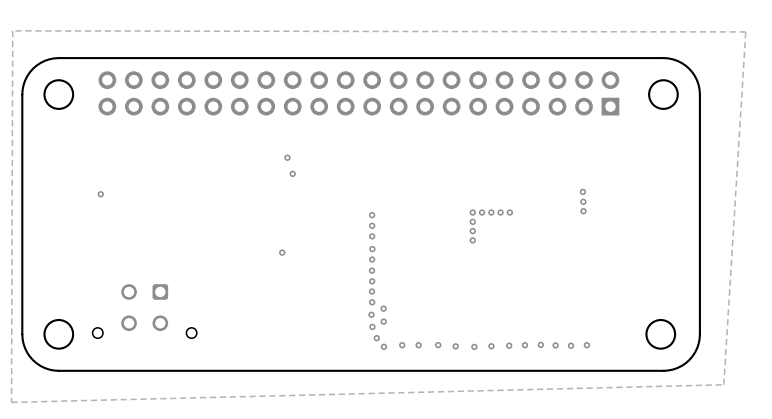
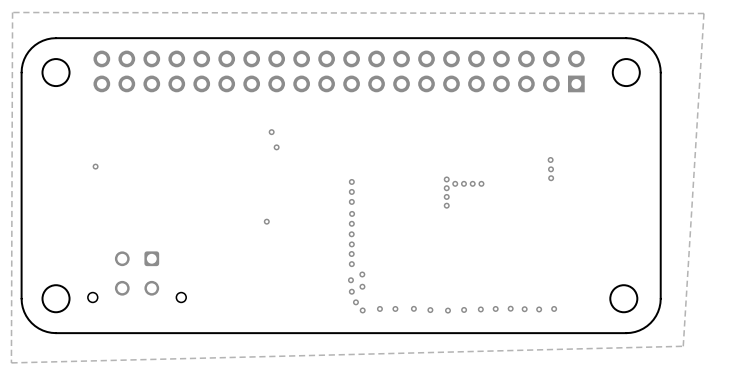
via: none -> (550, 159)
via: (582, 191) -> none
via: none -> (551, 169)
via: (583, 201) -> none
via: none -> (551, 178)
via: none -> (446, 179)
via: none -> (351, 181)
via: (583, 211) -> none
via: (472, 212) -> none
via: (372, 215) -> none
via: none -> (446, 188)
via: none -> (351, 191)
via: (472, 221) -> none
via: (372, 225) -> none
via: none -> (446, 196)
via: none -> (351, 201)
via: (472, 231) -> none
via: none -> (446, 205)
via: (372, 236) -> none
via: (472, 240) -> none
via: none -> (352, 213)
via: (372, 249) -> none
via: none -> (351, 223)
via: (372, 259) -> none
via: none -> (351, 234)
via: (372, 270) -> none
via: none -> (351, 244)
via: (372, 281) -> none
via: none -> (351, 254)
via: (372, 291) -> none
via: none -> (351, 264)
via: (372, 302) -> none

